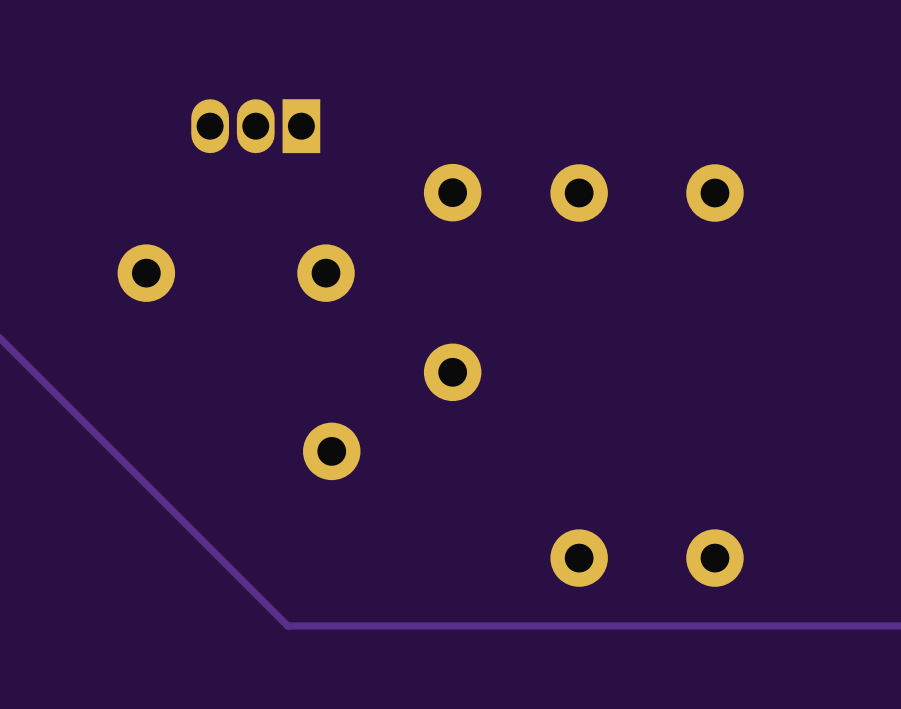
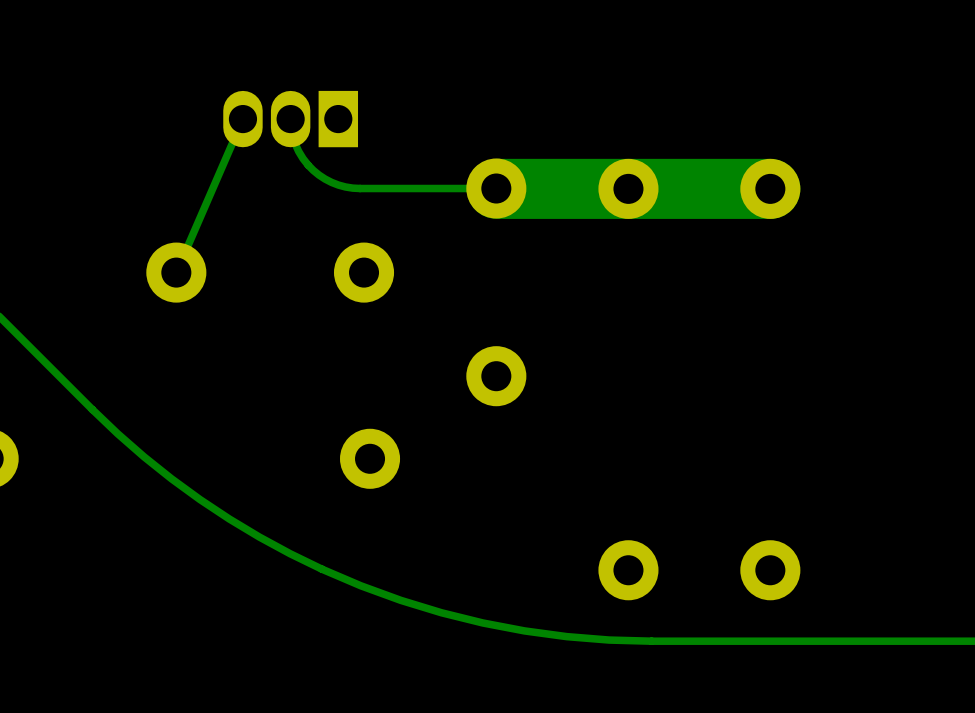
track: none -> (242, 119) (176, 272)
track: none -> (290, 119) (292, 135) (303, 158) (319, 175) (338, 185) (360, 188) (496, 188)
track: none -> (770, 188) (496, 188)
track: (65, 404) (287, 625) (601, 625) -> (92, 409) (144, 456) (171, 478) (229, 518) (290, 553) (360, 585) (400, 600) (482, 622) (566, 636) (651, 641)

